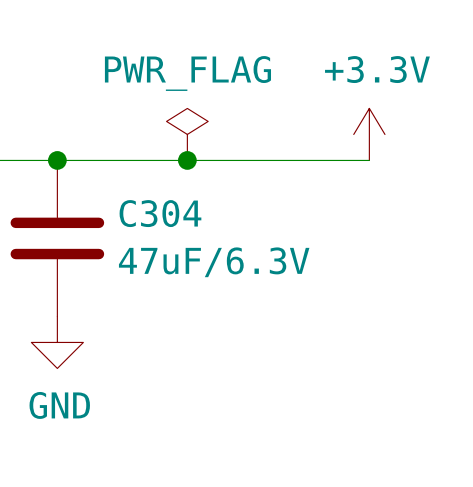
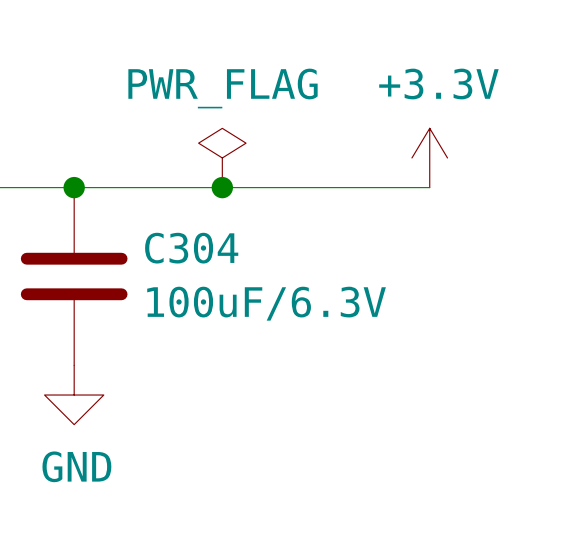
C304 value: 47uF/6.3V (214, 262) -> 100uF/6.3V (266, 303)

